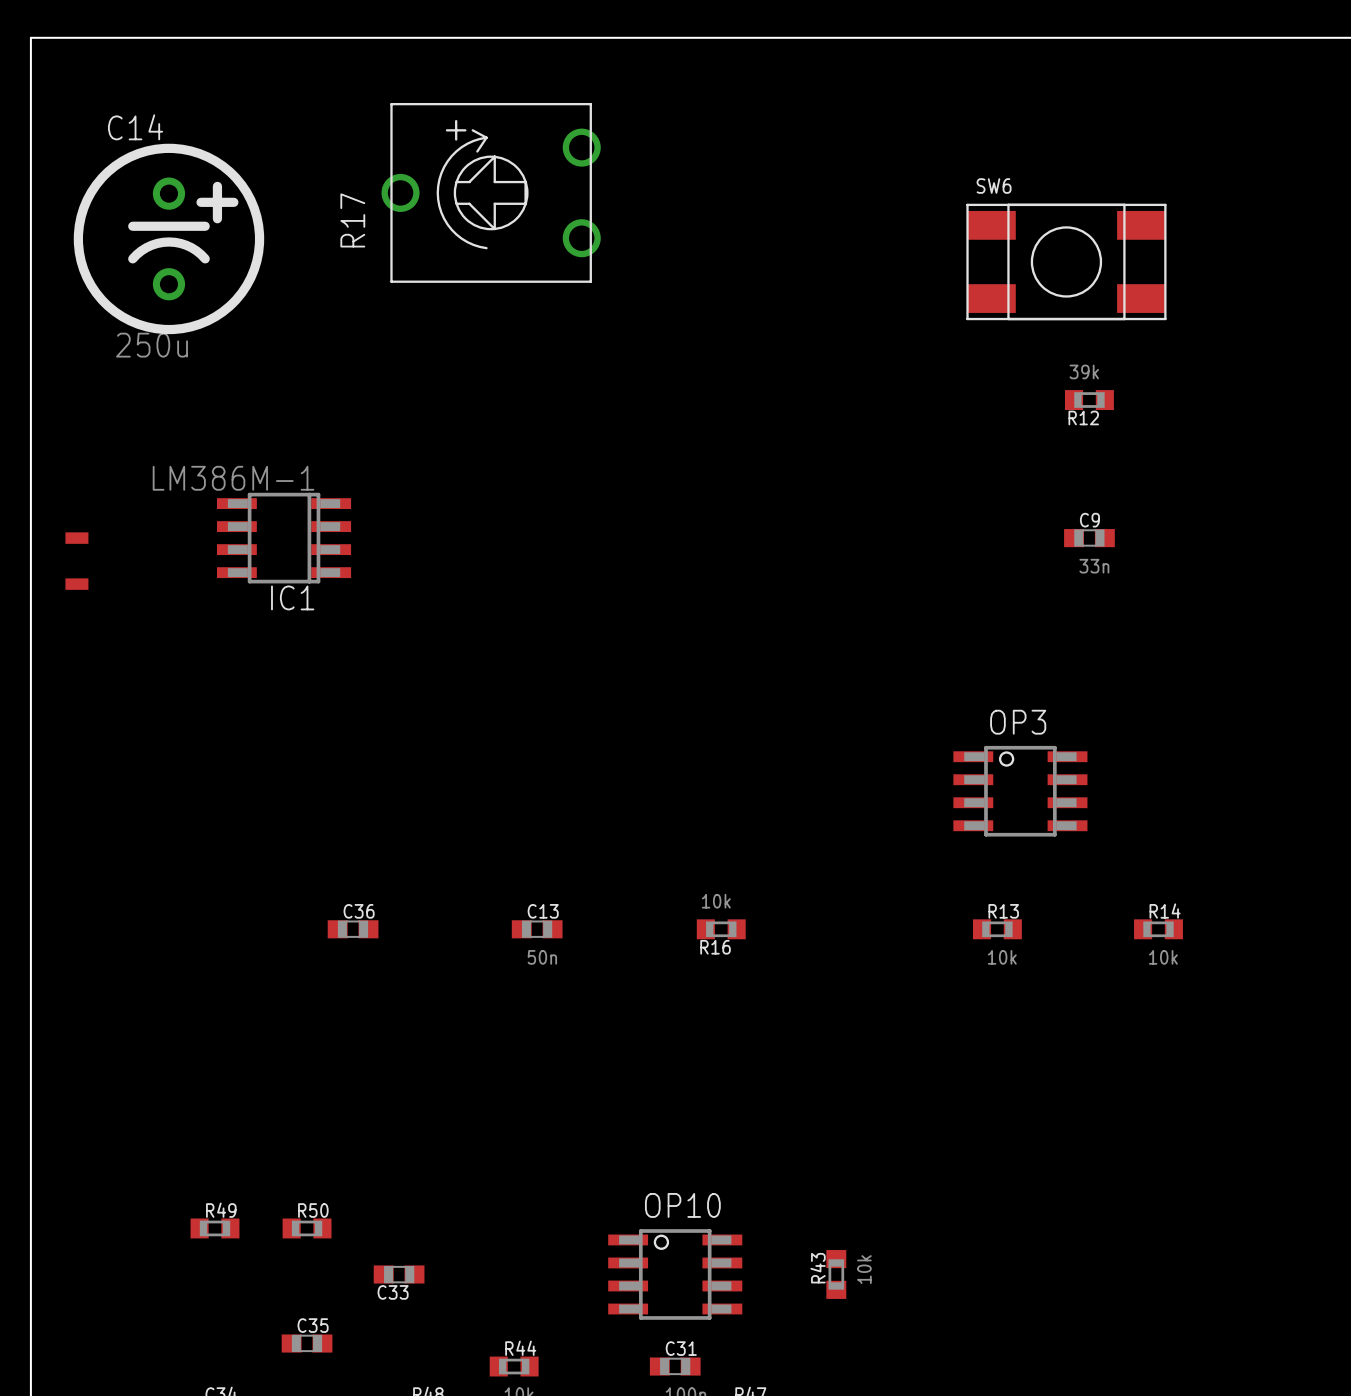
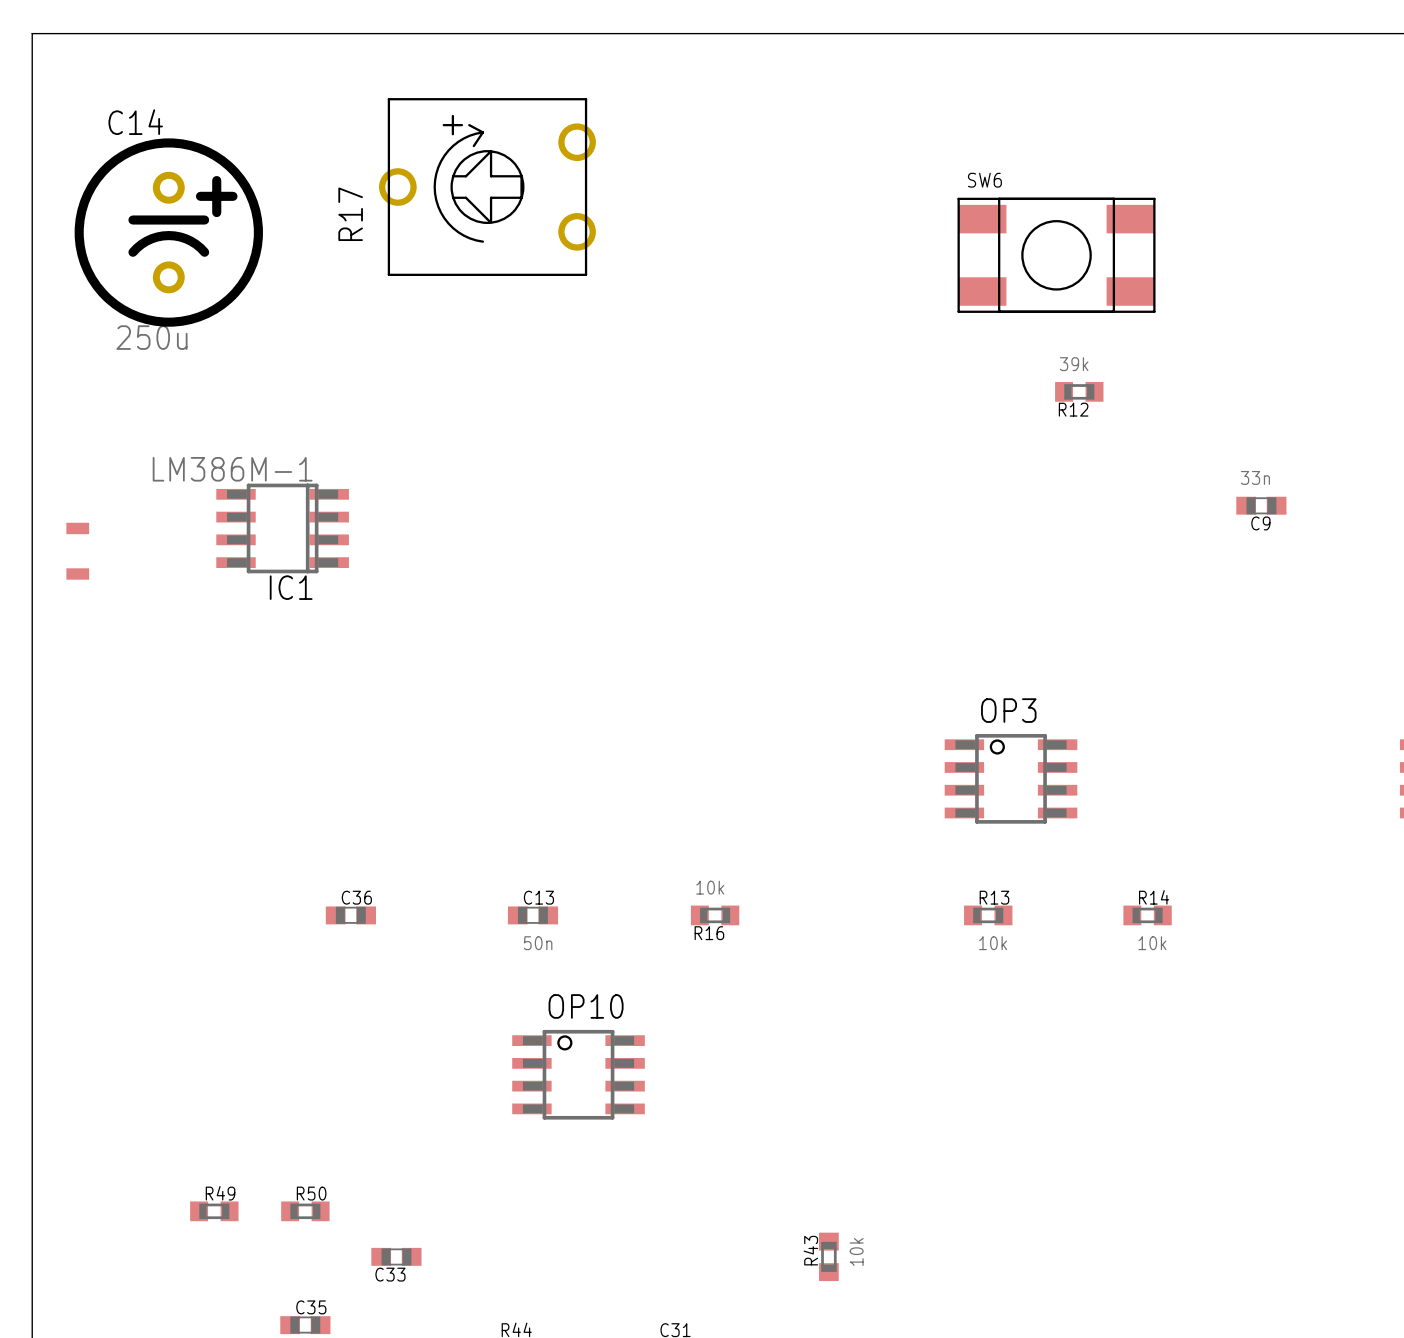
C9 name position: C9 (1089, 520) -> C9 (1260, 523)
C9 position: (1089, 538) -> (1261, 505)
C9 value position: 33n (1094, 566) -> 33n (1255, 477)
OP10 position: (675, 1274) -> (578, 1074)

